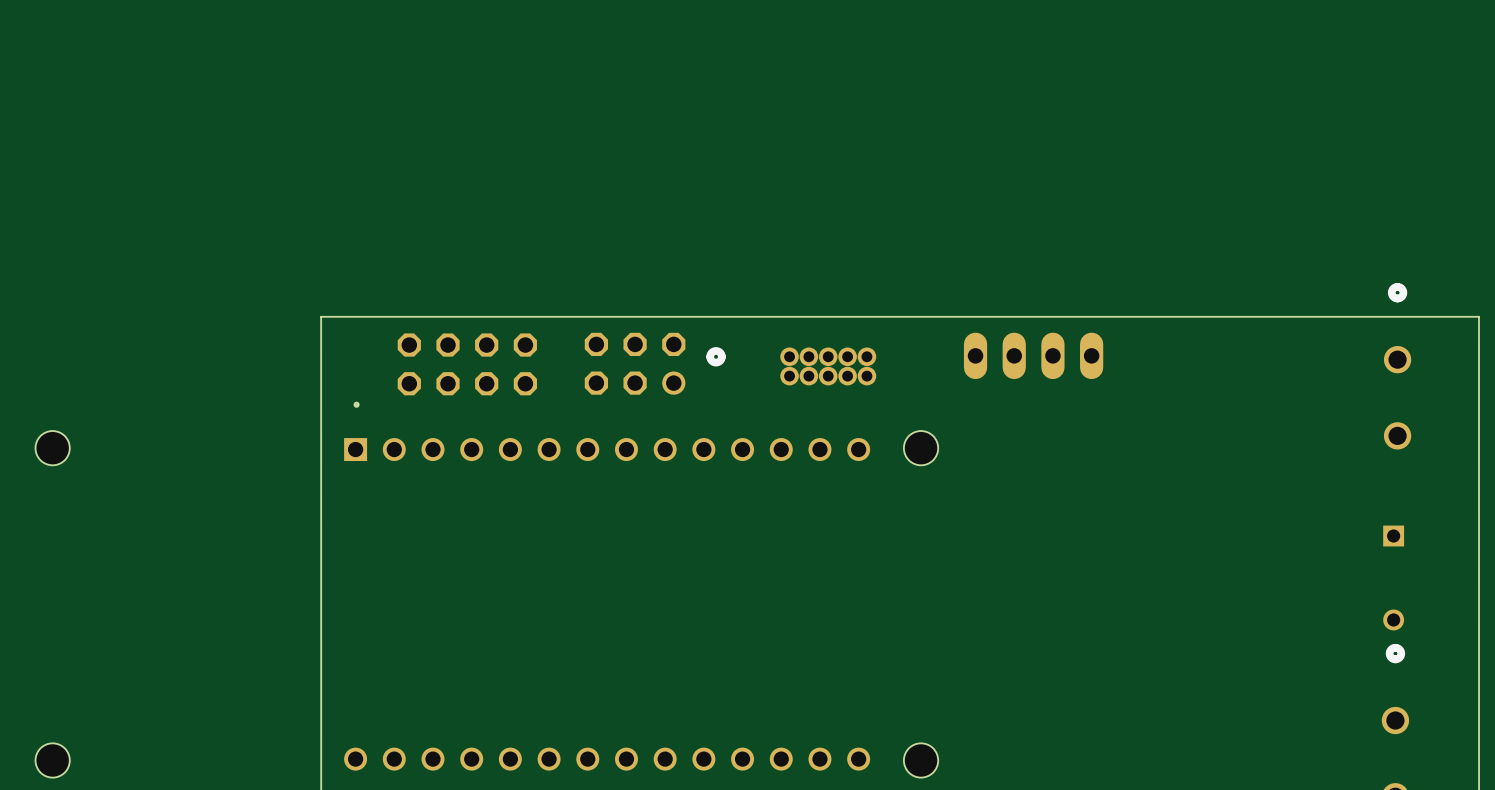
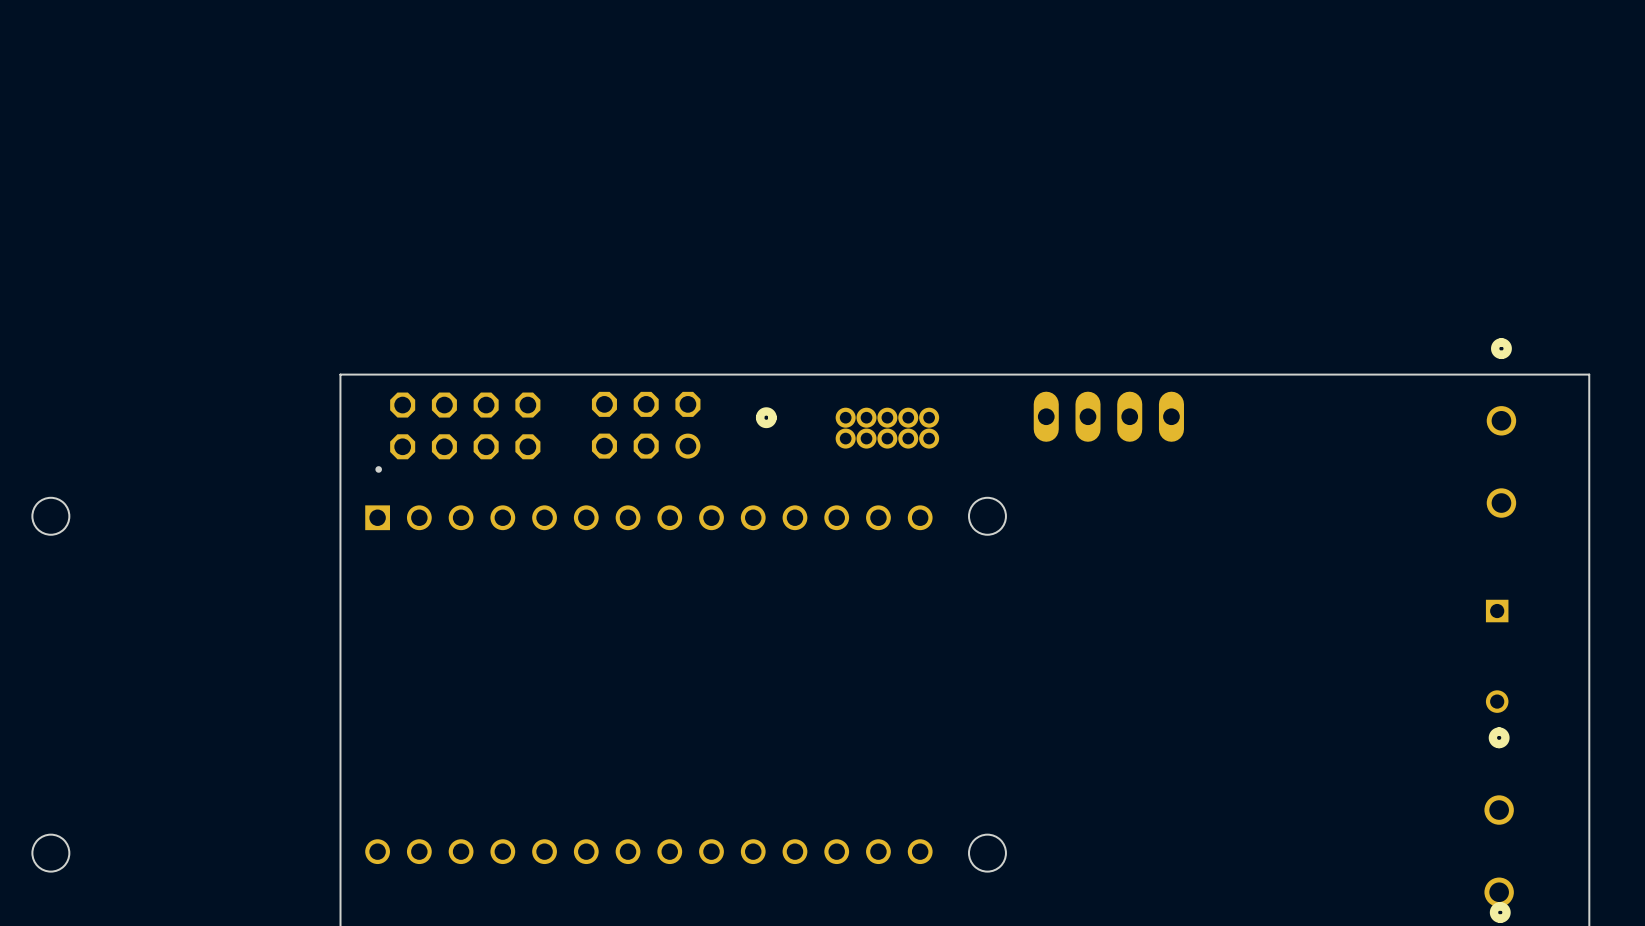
part position: (635, 363) -> (646, 425)
part position: (467, 364) -> (465, 425)

